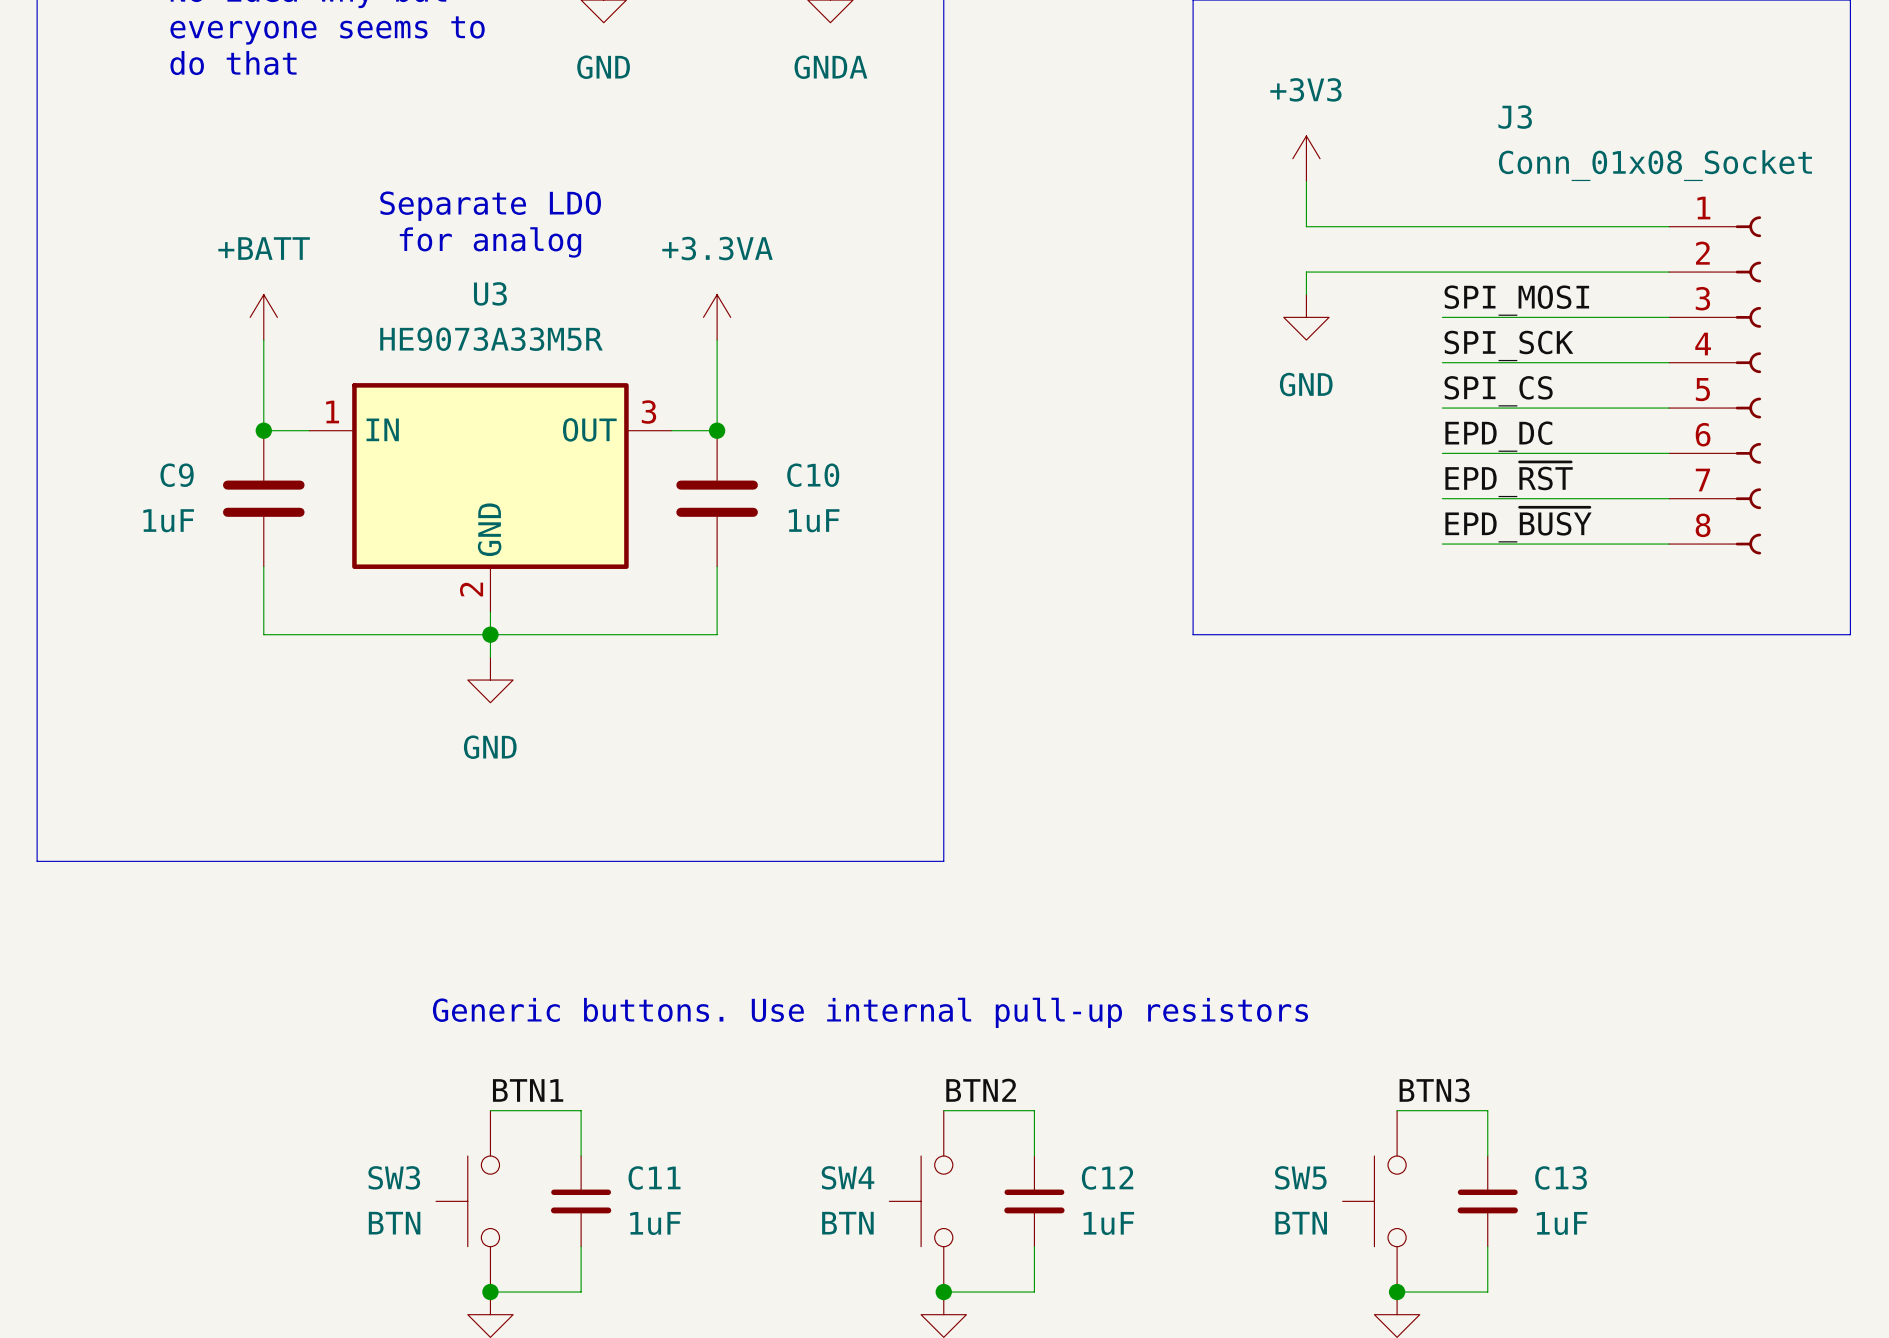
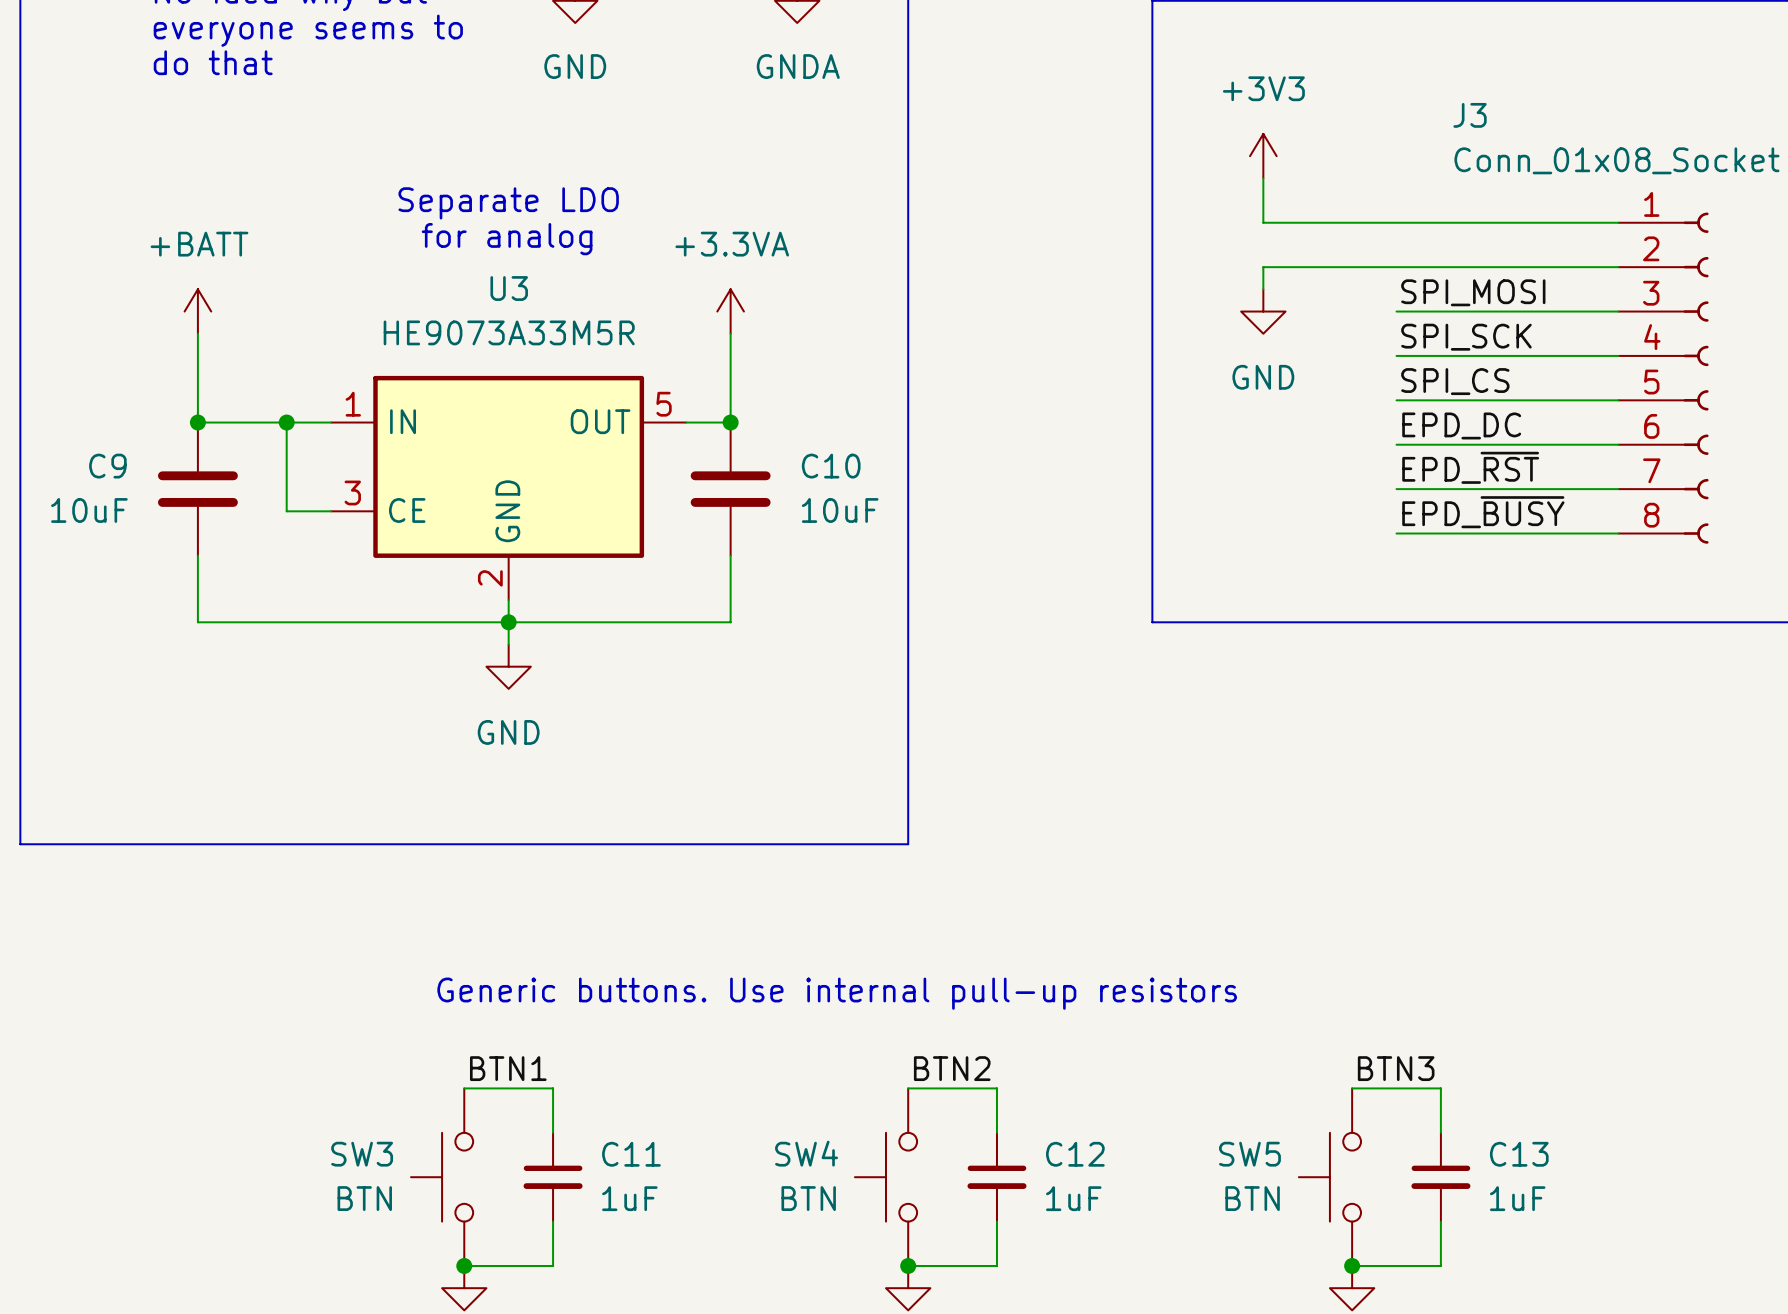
text position: Separate LDO (490, 206) -> Separate LDO (508, 203)
text position: for analog (490, 242) -> for analog (507, 239)
power symbol position: +BATT (263, 317) -> +BATT (197, 311)
power symbol position: +3.3VA (717, 317) -> +3.3VA (730, 311)
wire: (263, 340) (263, 430) -> (197, 333) (197, 422) (242, 422)
wire: (717, 340) (717, 430) (671, 430) -> (730, 333) (730, 422) (686, 422)
U3 symbol: [309, 383, 672, 613] -> [331, 375, 687, 601]
junction: none -> (197, 422)
junction: (263, 430) -> none
junction: none -> (286, 422)
wire: none -> (331, 422) (286, 422) (286, 511) (331, 511)
junction position: (717, 430) -> (730, 422)
C9 position: (263, 498) -> (197, 489)
C10 position: (717, 498) -> (730, 489)
C9 value: 1uF (168, 520) -> 10uF (89, 510)
C10 value: 1uF (814, 520) -> 10uF (840, 510)
wire: (263, 566) (263, 634) -> (197, 555) (197, 622) (242, 622)
wire: (717, 566) (717, 634) -> (730, 555) (730, 622) (686, 622)
wire: (490, 612) (490, 657) -> (508, 600) (508, 644)
junction position: (490, 634) -> (508, 622)
power symbol position: GND (490, 680) -> GND (508, 666)

